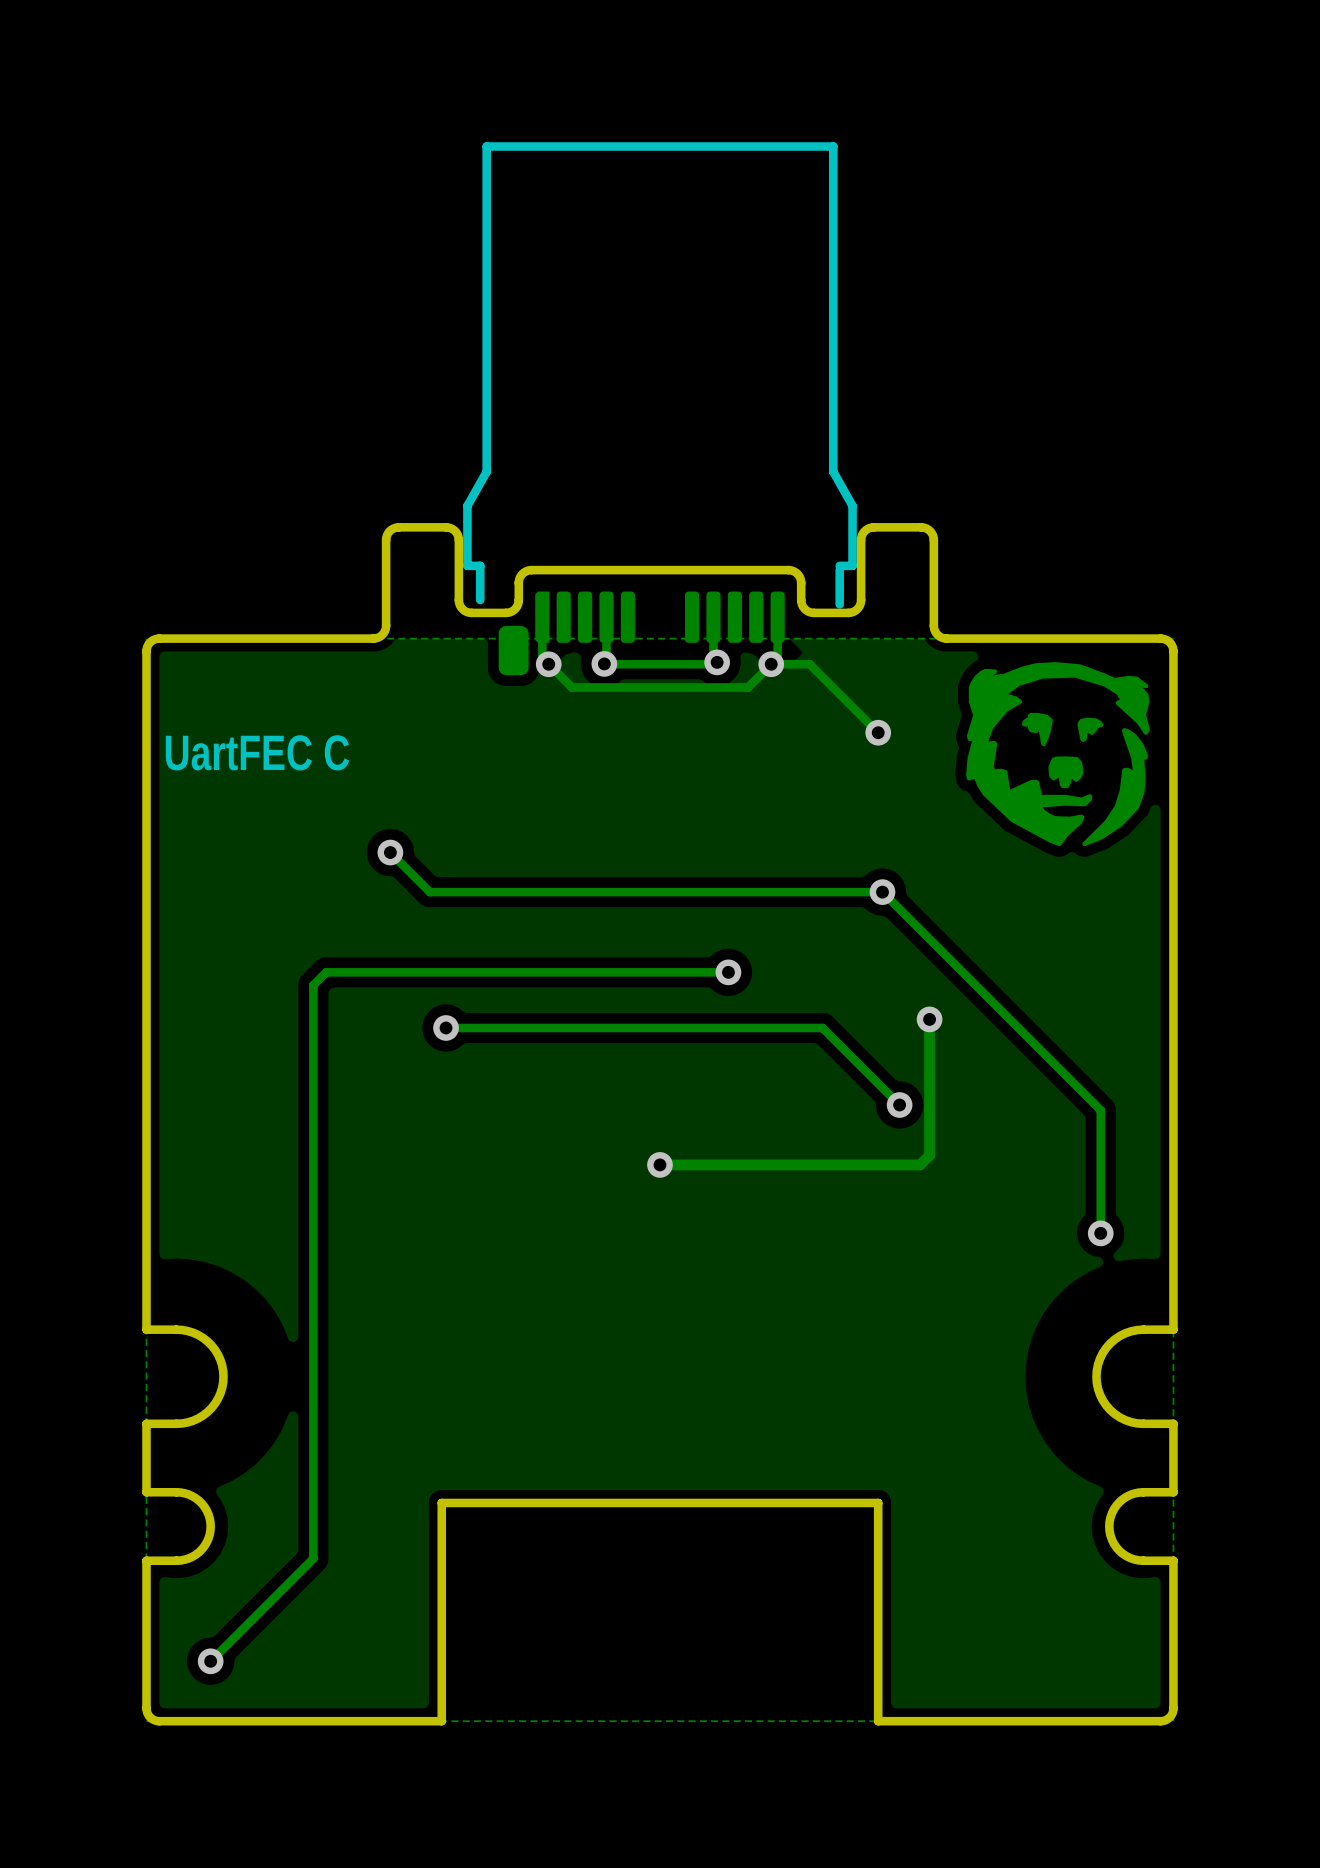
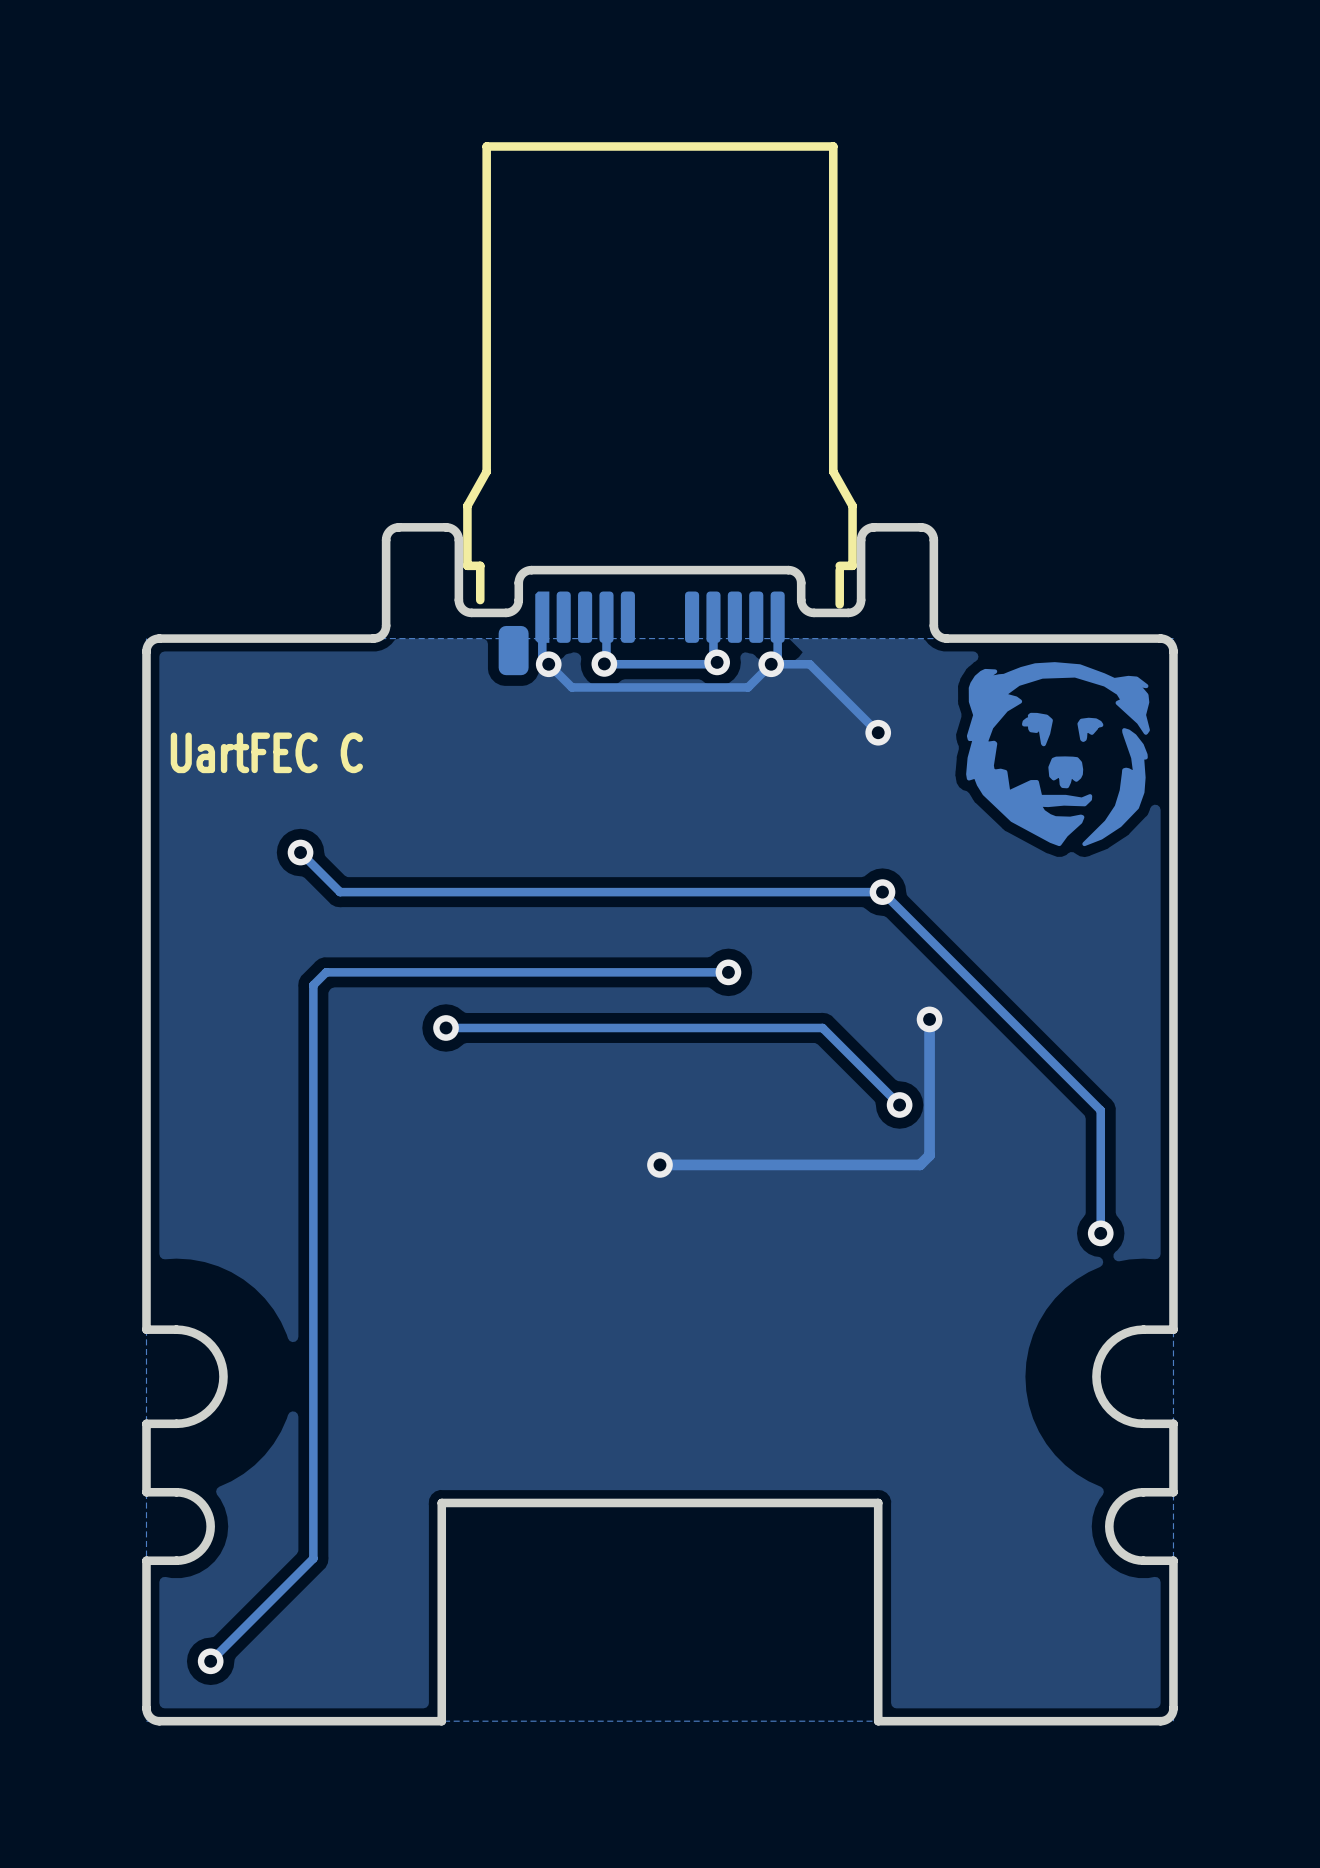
track: (390, 852) (429, 892) -> (300, 852) (340, 892) (429, 892)
via position: (390, 852) -> (300, 852)

